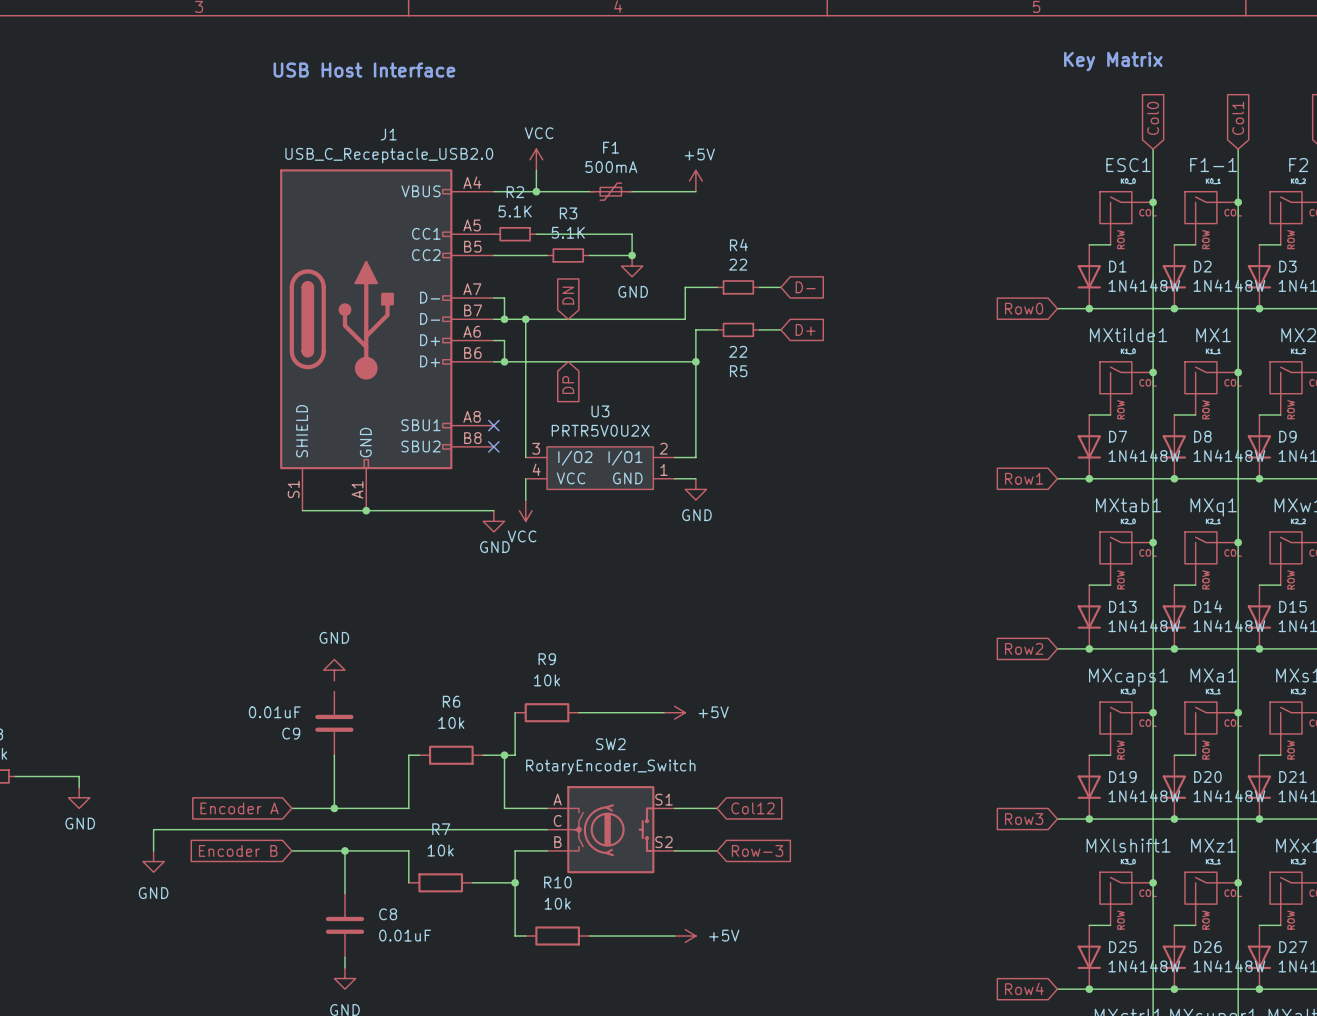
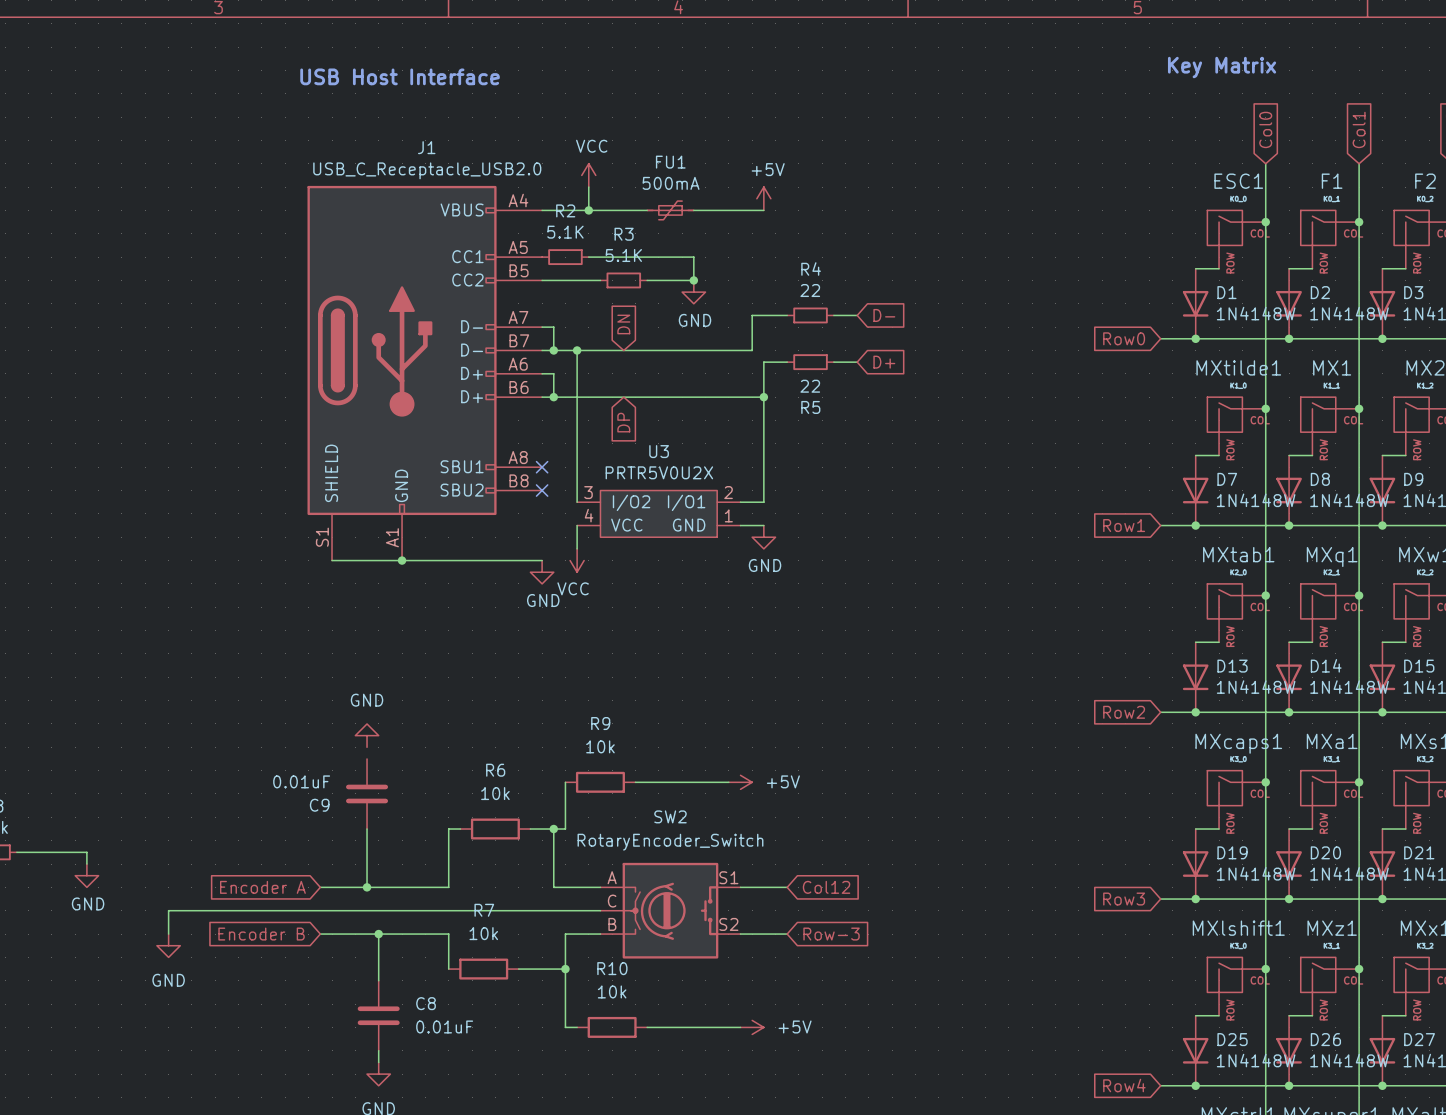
F1 name: F1 (611, 147) -> FU1 (670, 162)
F1-1 name: F1-1 (1213, 165) -> F1 (1332, 181)

